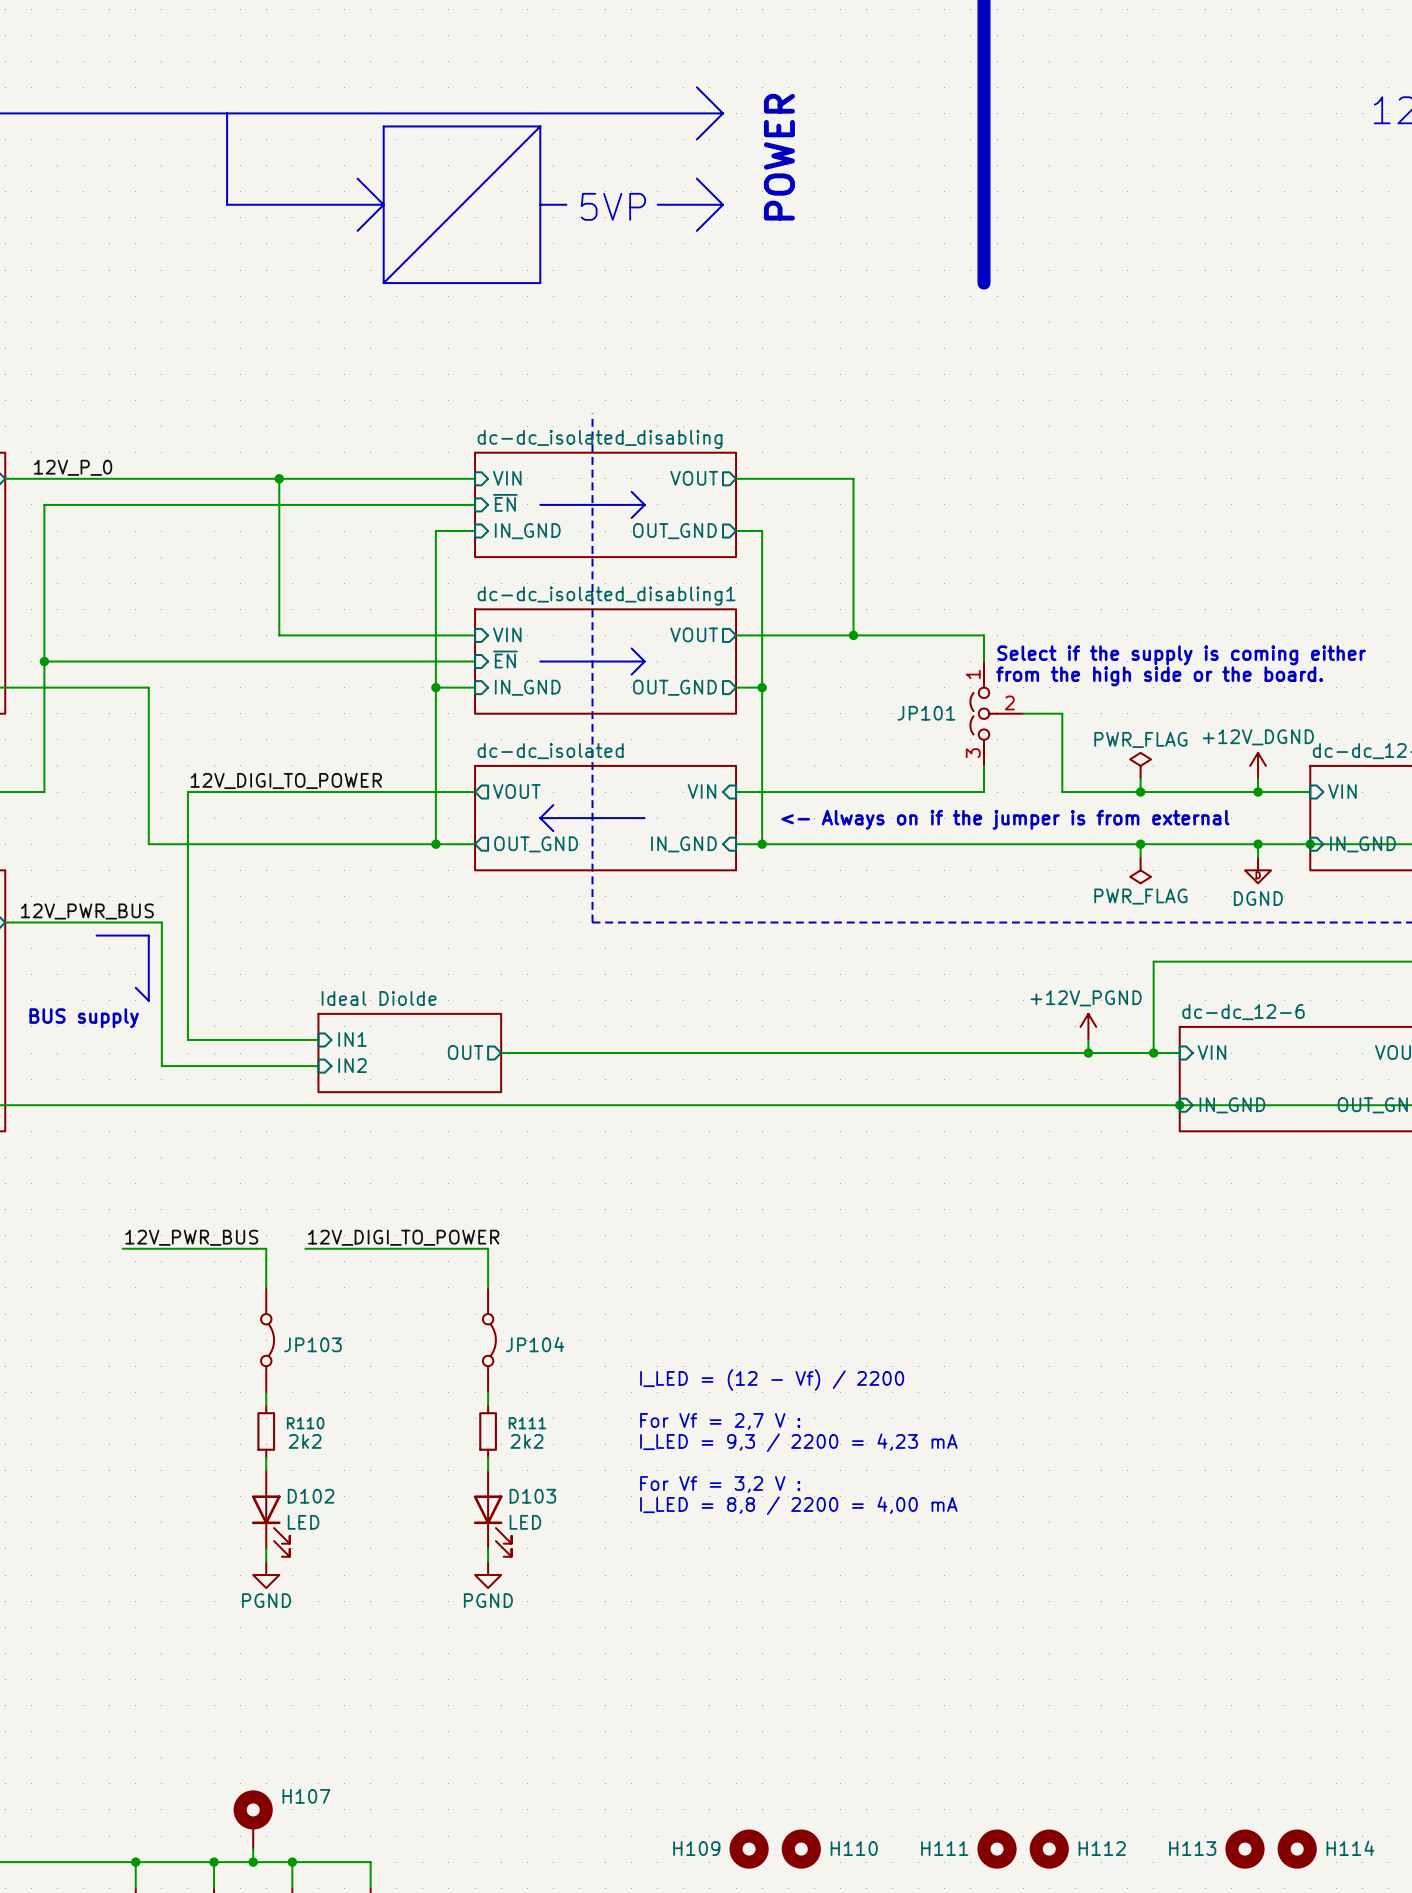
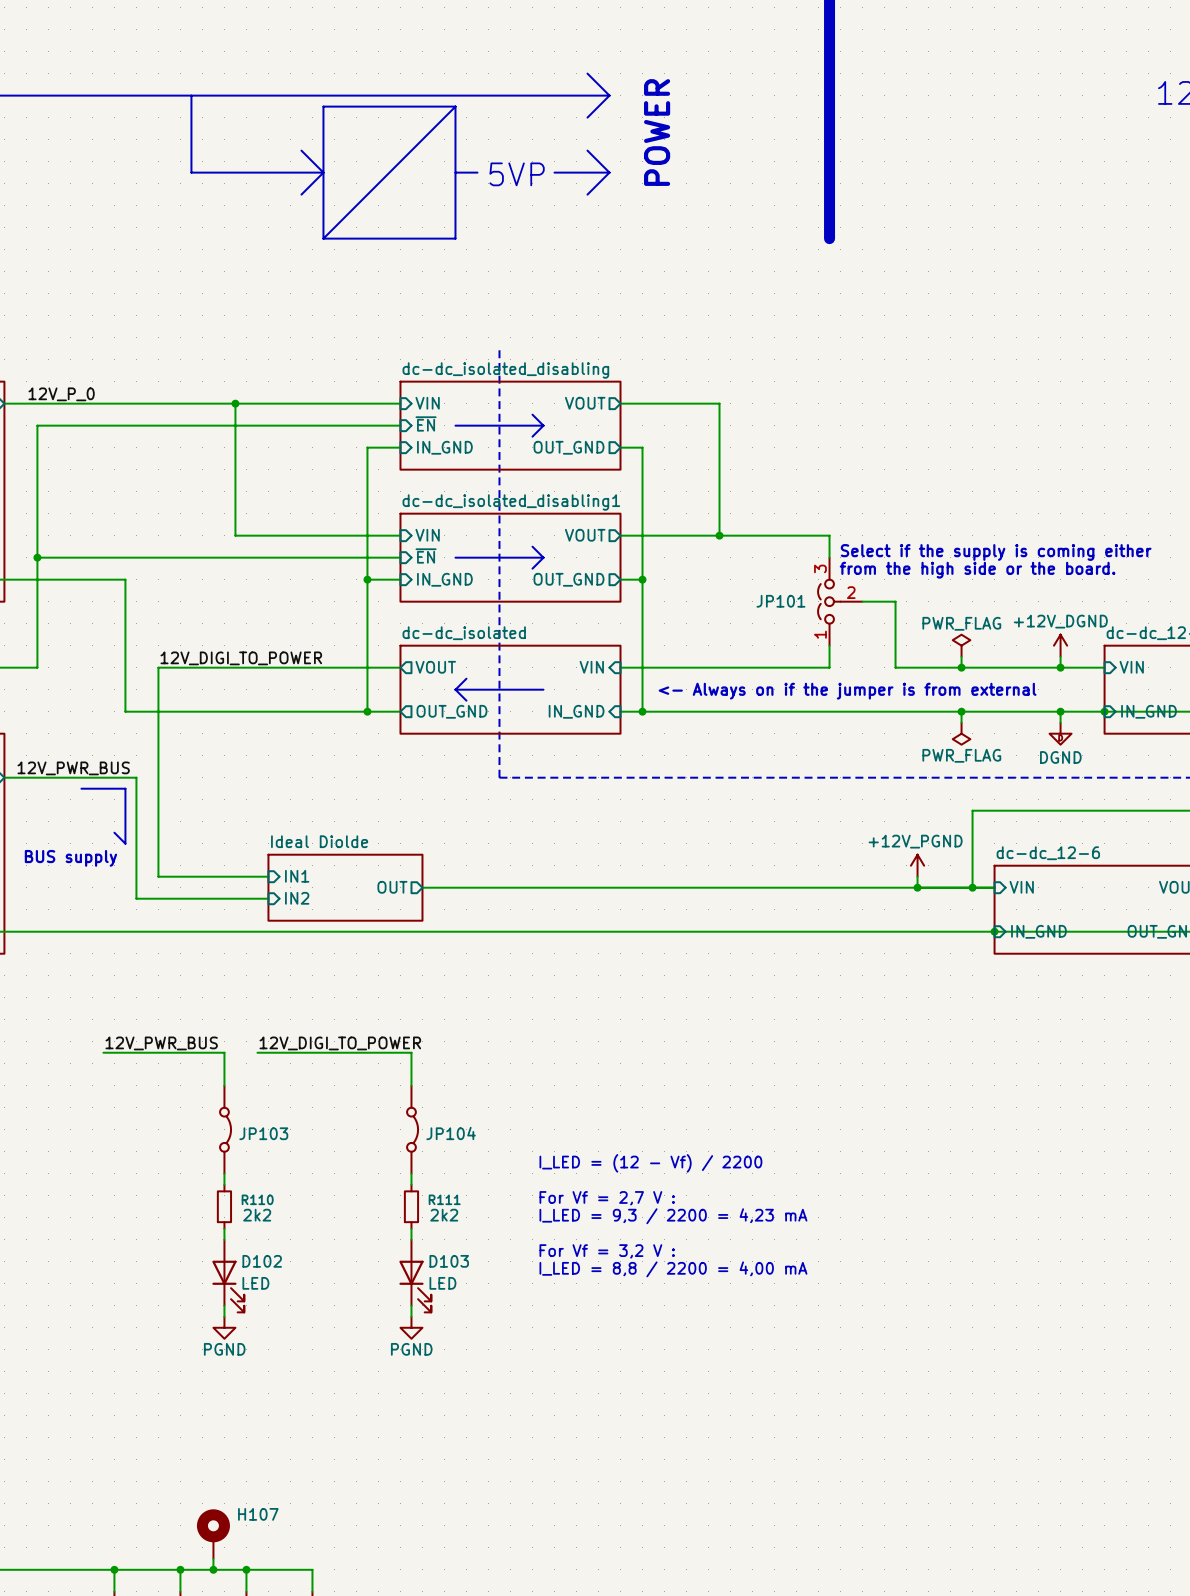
JP101 flip: as is (983, 713) -> up-down (829, 601)
H109: (749, 1849) -> none
H110: (801, 1849) -> none
H111: (997, 1849) -> none
H112: (1049, 1849) -> none
H113: (1245, 1849) -> none
H114: (1297, 1849) -> none

